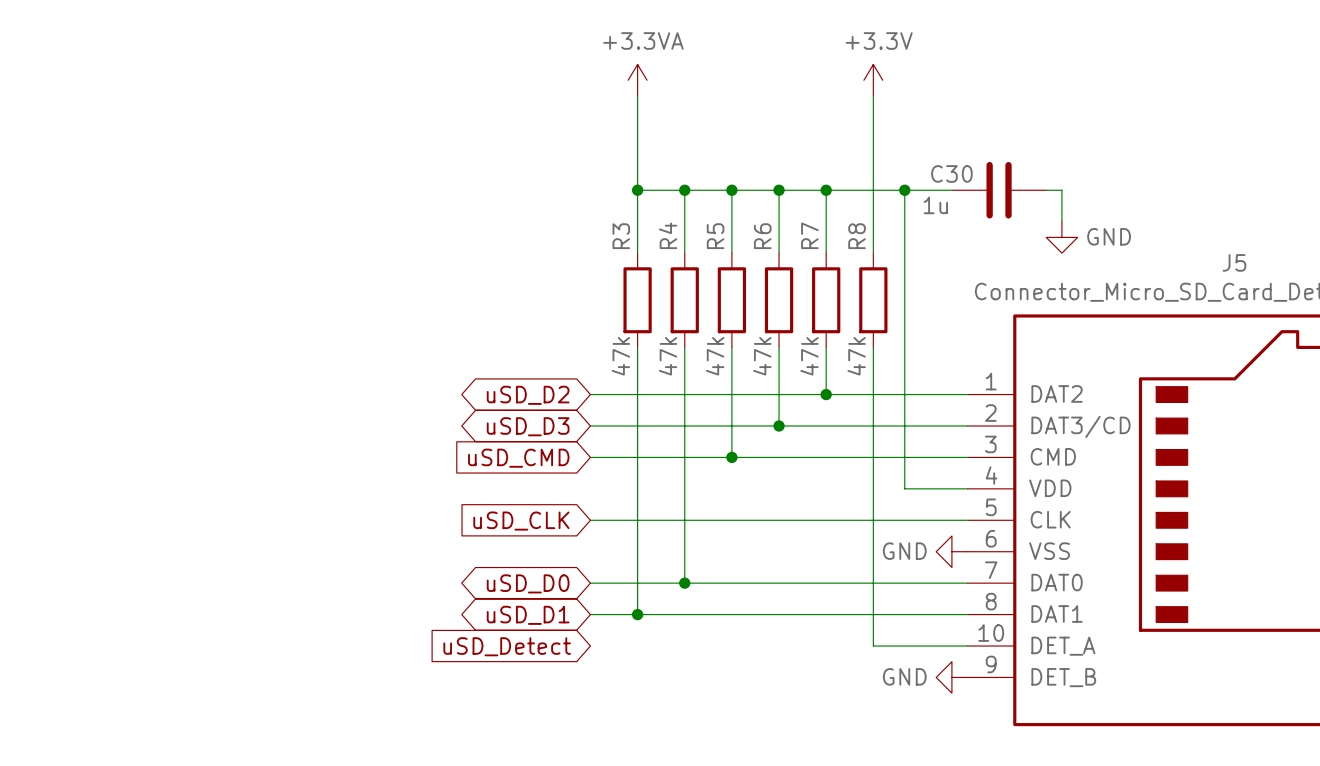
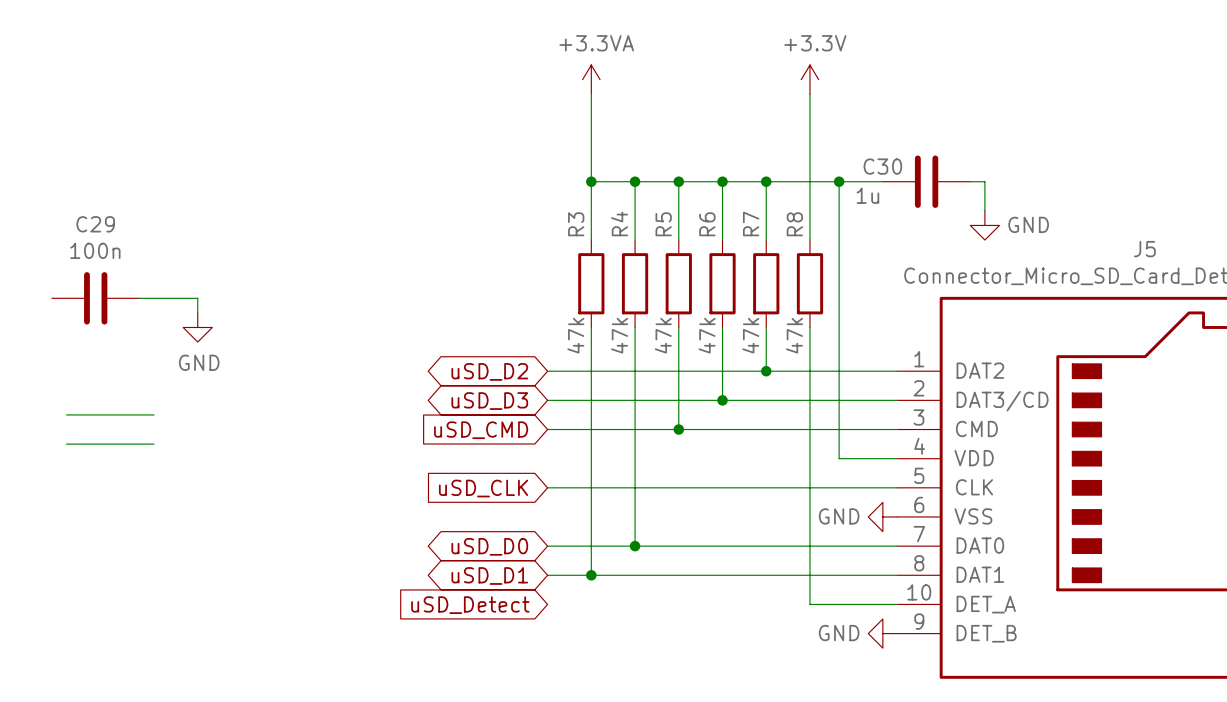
C29: none -> 100n (95, 298)
wire: none -> (139, 298) (197, 298) (197, 312)
power symbol: none -> GND (197, 327)
wire: none -> (66, 414) (154, 414)
wire: none -> (66, 444) (154, 444)

